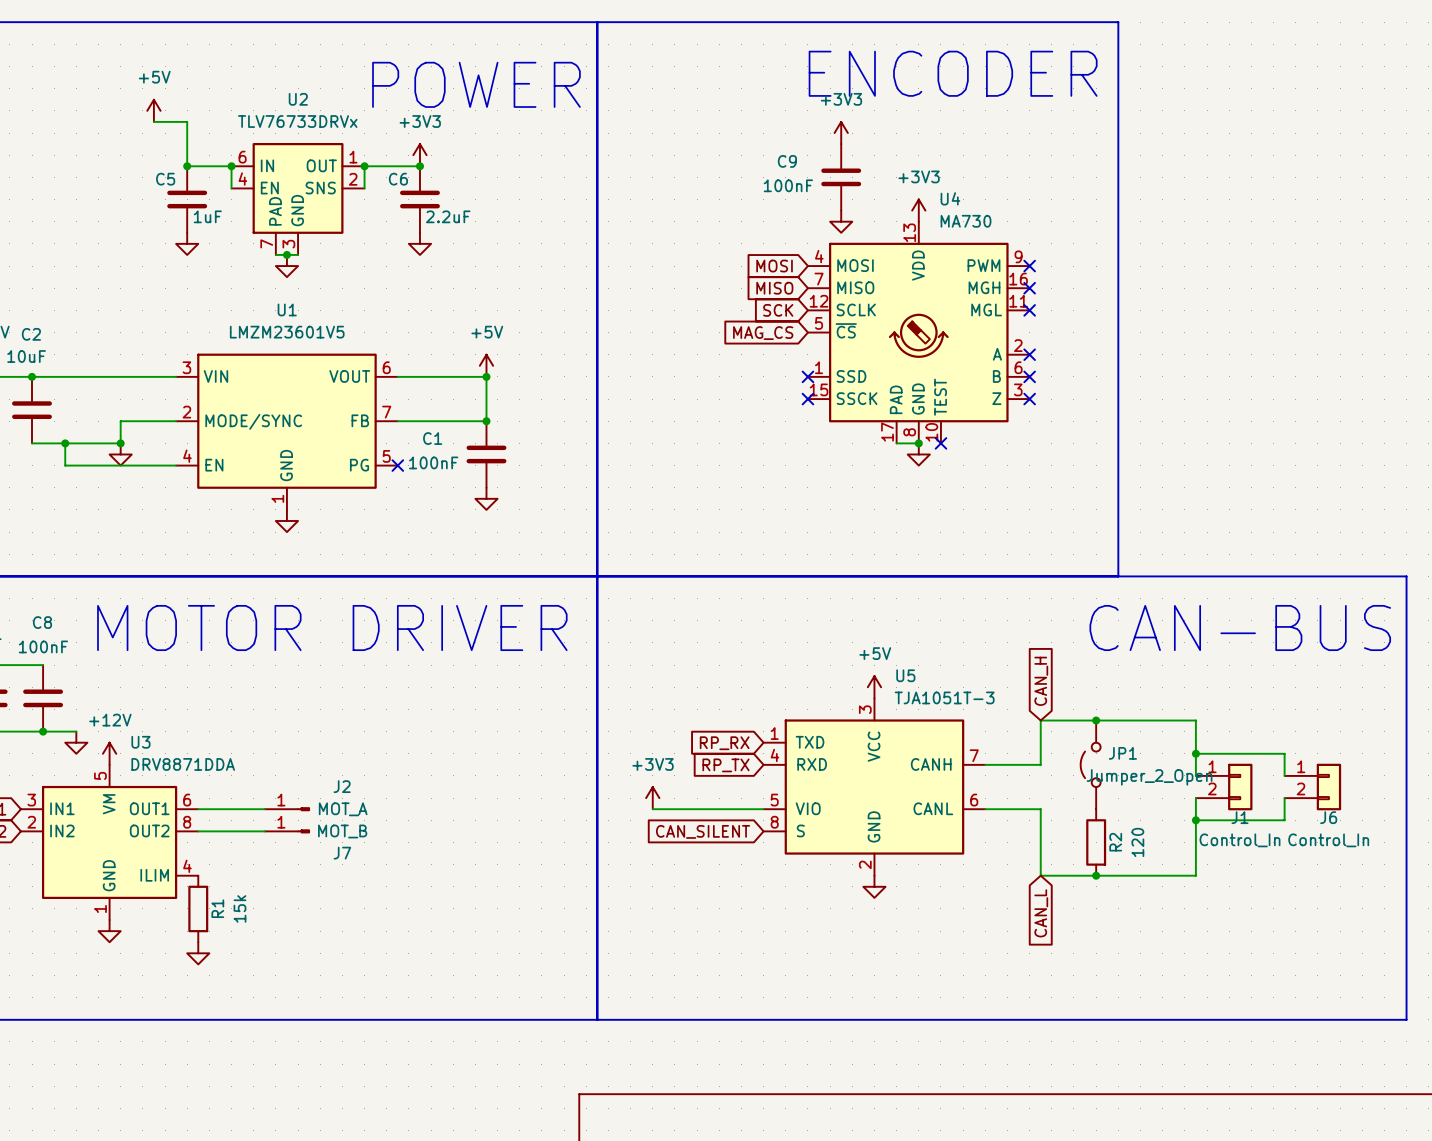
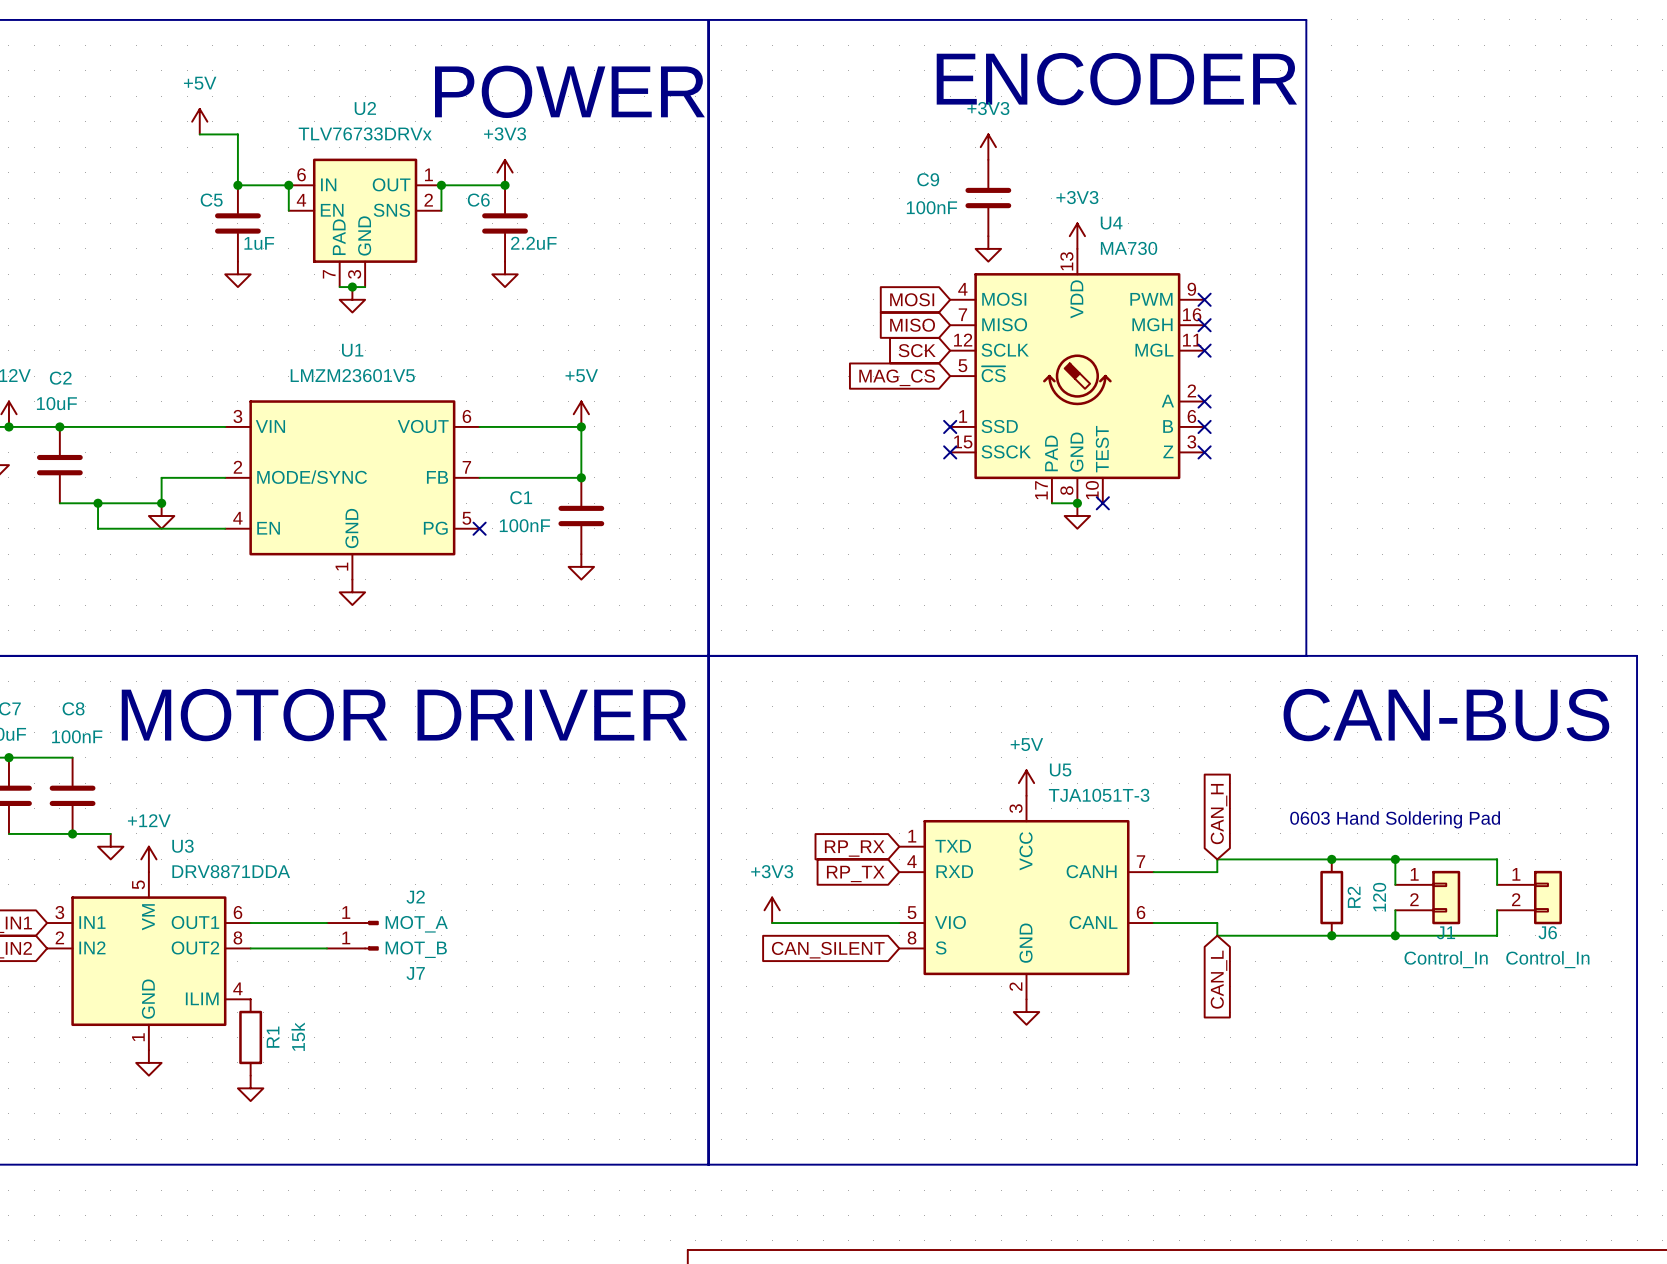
global label position: CAN_H (1041, 681) -> CAN_H (1219, 814)
text: none -> 0603 Hand Soldering Pad (1395, 819)
junction: (1096, 720) -> none
wire: (1040, 753) (1040, 720) (1195, 720) (1195, 753) -> (1217, 859) (1395, 859)
junction: none -> (1331, 859)
JP1: Jumper_2_Open (1090, 764) -> none
wire: (1040, 820) (1040, 875) (1195, 875) (1195, 820) -> (1217, 935) (1395, 935)
junction: none -> (1331, 935)
R2 position: (1096, 842) -> (1331, 897)
junction: (1096, 875) -> none
global label position: CAN_L (1041, 913) -> CAN_L (1219, 979)

